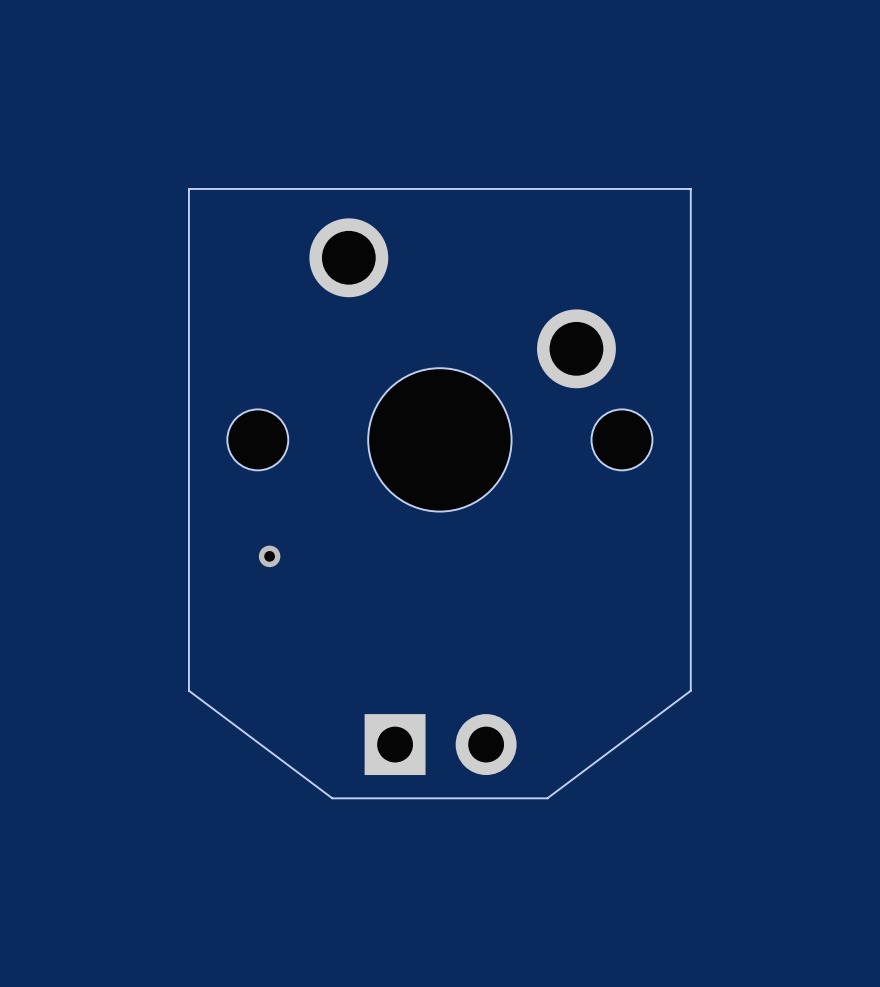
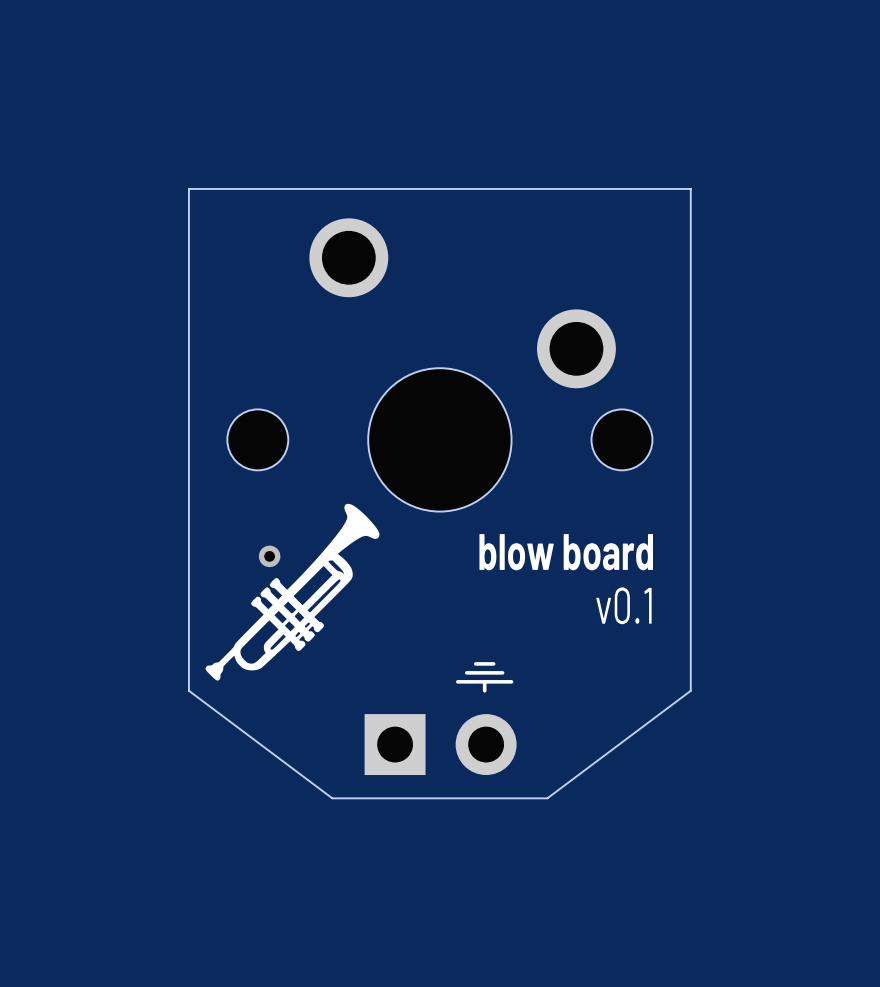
drawing: none -> [205, 503, 380, 681]
text: none -> blow board (566, 552)
text: none -> v0.1 (623, 605)
line: none -> (493, 663) (475, 663)
line: none -> (502, 672) (466, 672)
line: none -> (484, 681) (484, 690)
line: none -> (511, 681) (457, 681)

